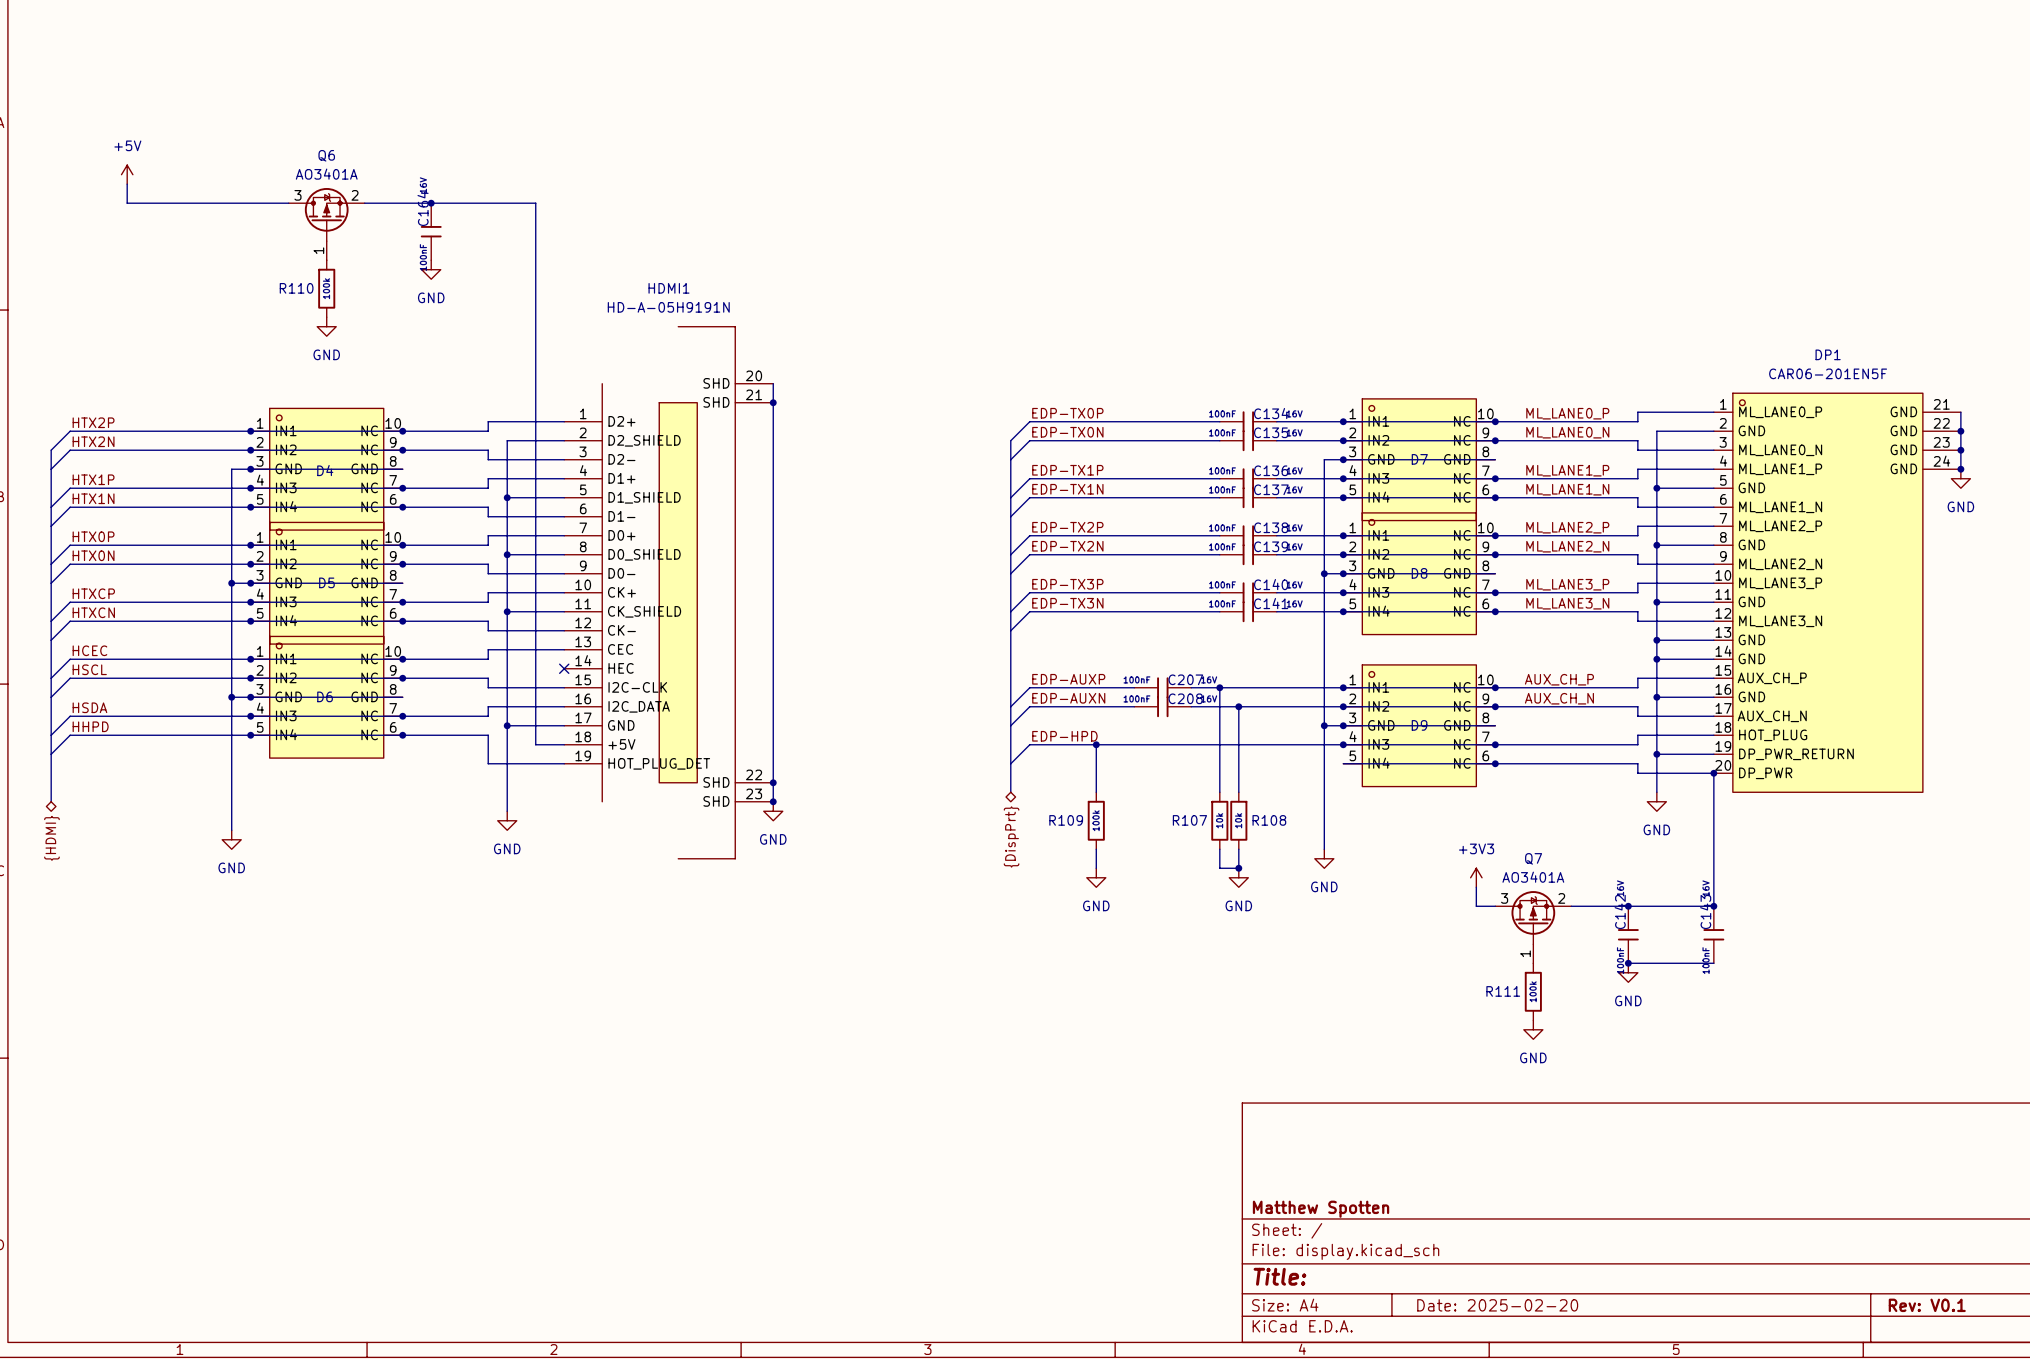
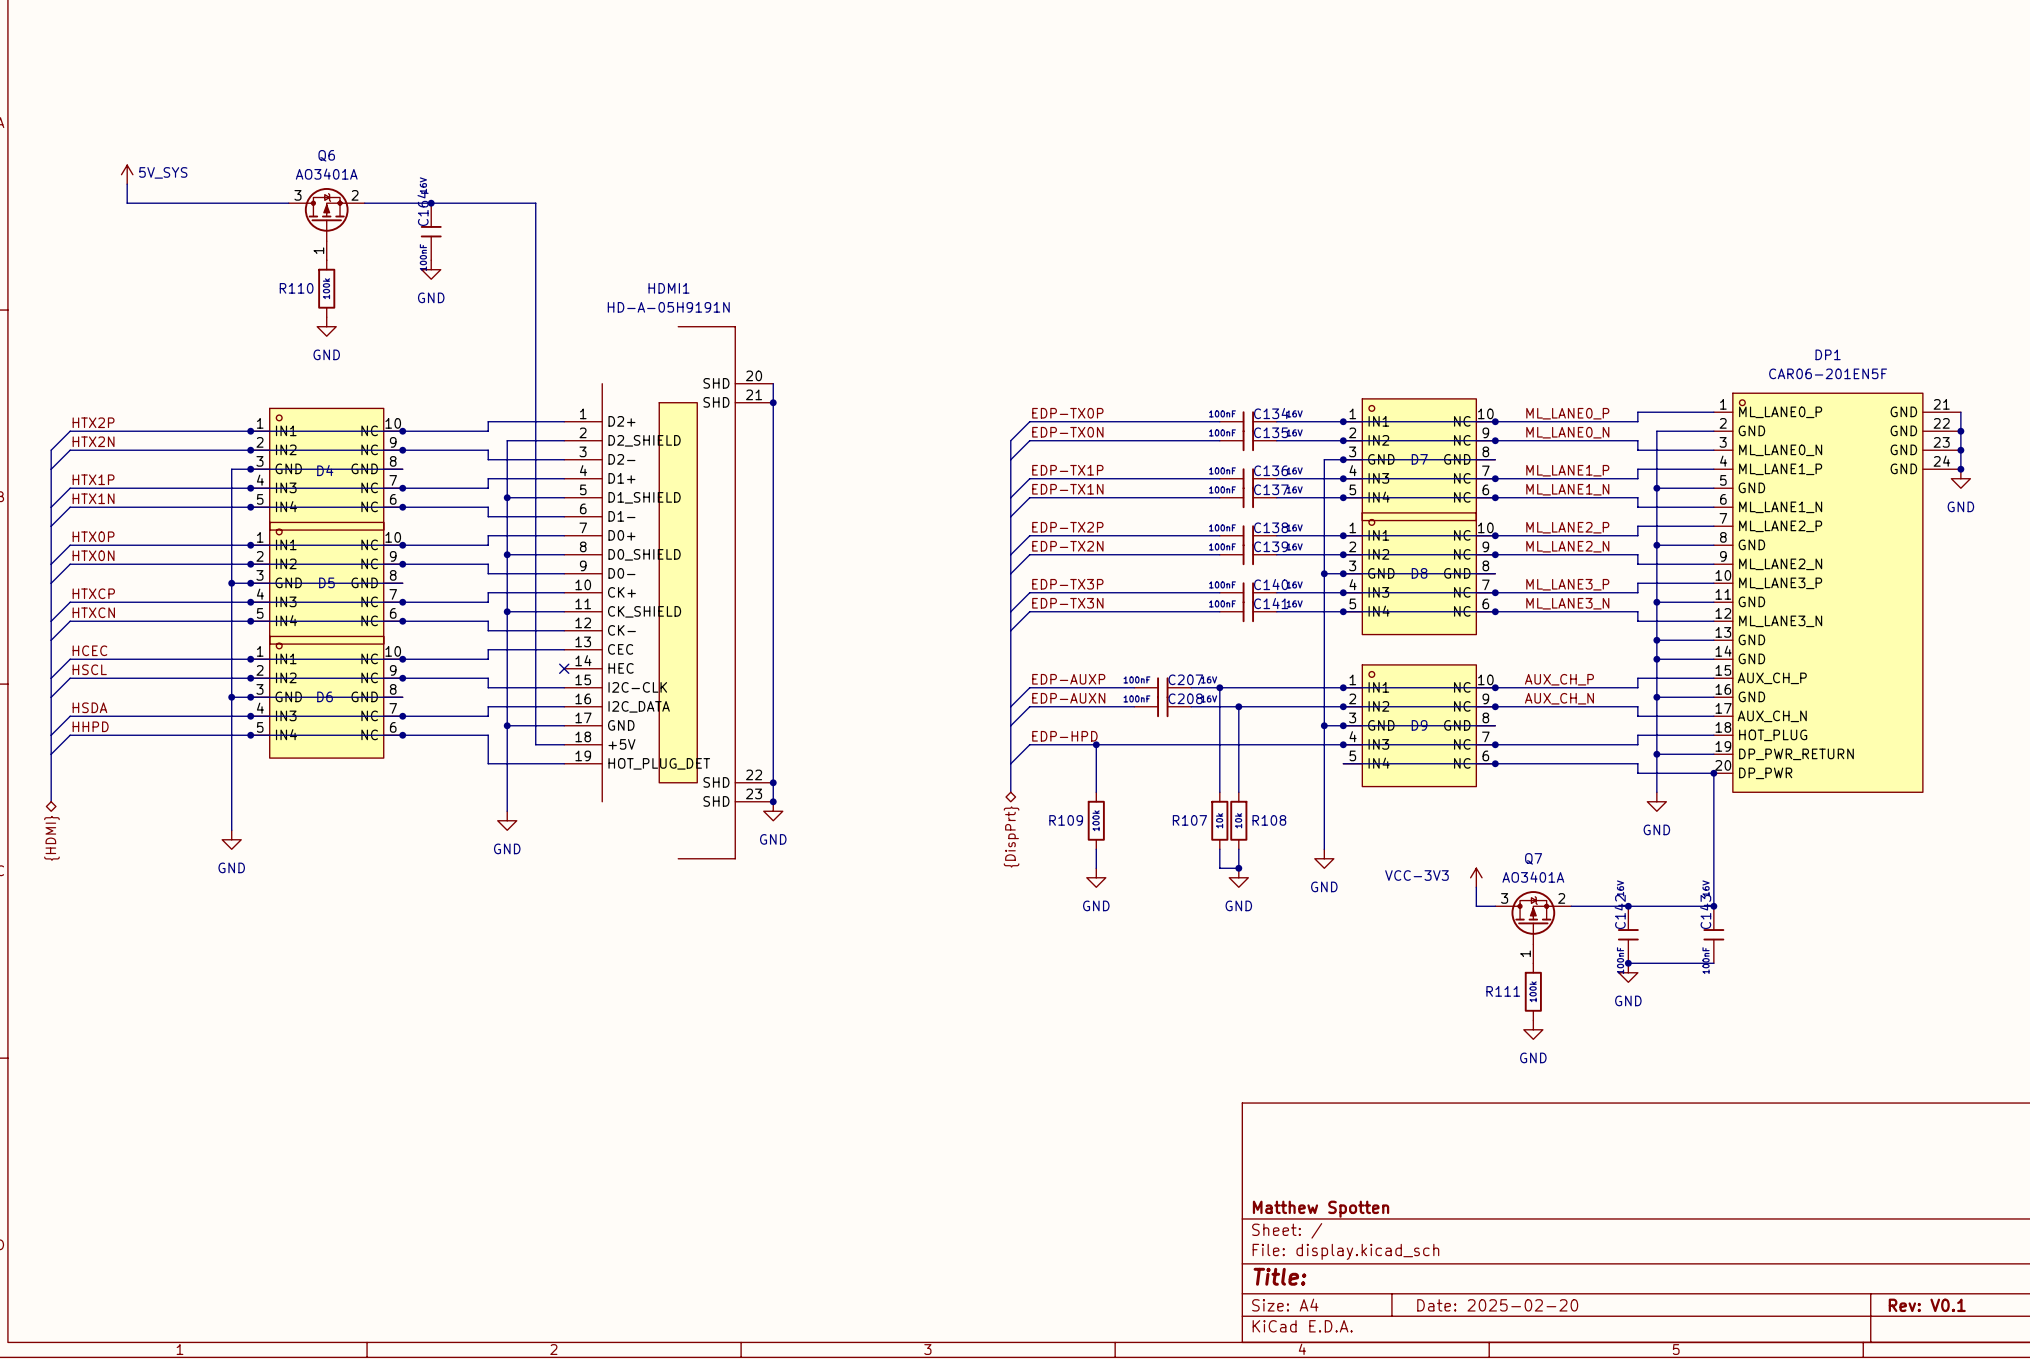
power symbol: +5V (127, 174) -> 5V_SYS (127, 174)
power symbol: +3V3 (1476, 877) -> VCC-3V3 (1476, 877)

